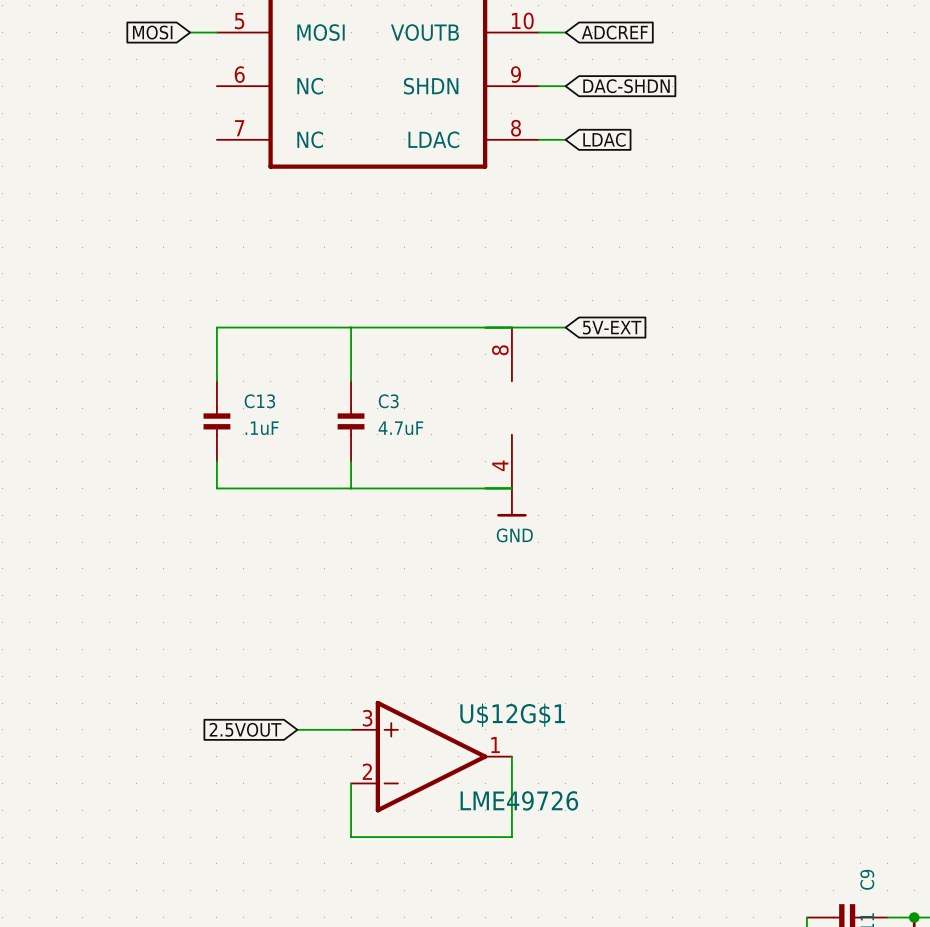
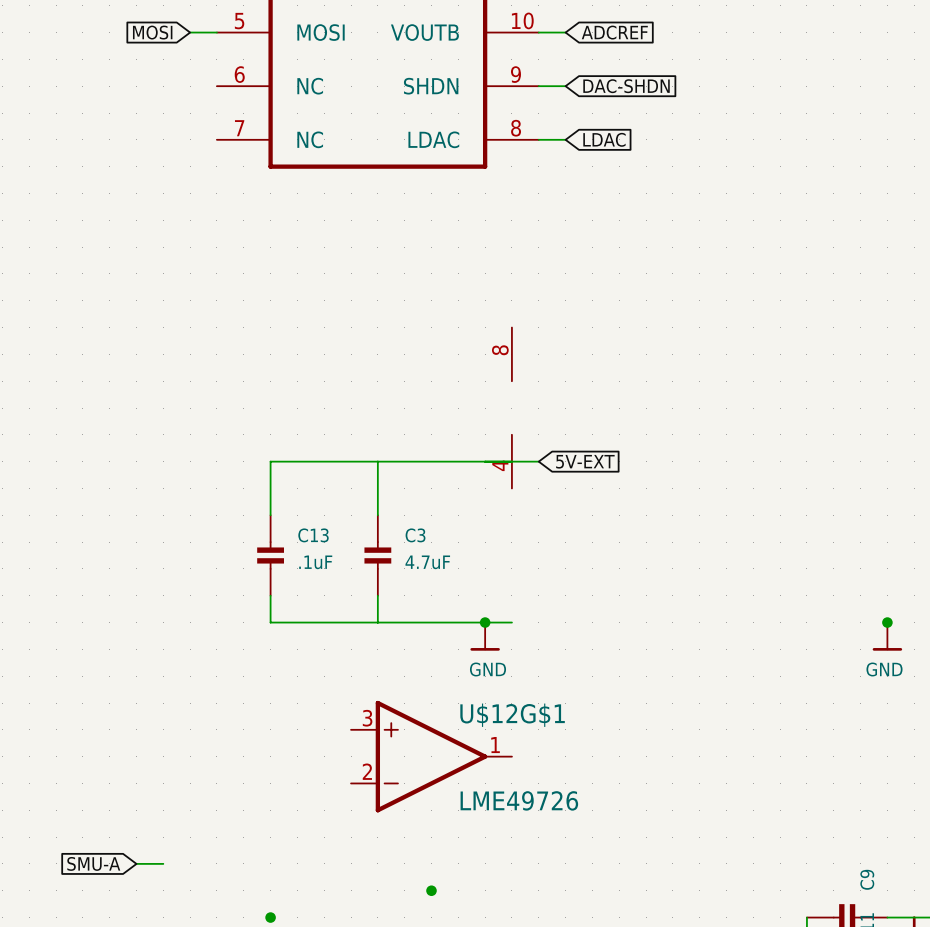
wire: (351, 327) (351, 381) -> (377, 461) (377, 515)
wire: (565, 327) (216, 327) (216, 381) -> none
global label position: 5V-EXT (612, 327) -> 5V-EXT (585, 461)
C13 position: (216, 421) -> (270, 555)
C3 position: (351, 421) -> (377, 555)
wire: (216, 461) (216, 488) (511, 488) -> none
wire: (351, 461) (351, 488) -> (377, 595) (377, 622)
wire: none -> (538, 461) (270, 461) (270, 515)
power symbol position: GND (511, 502) -> GND (485, 636)
wire: none -> (270, 595) (270, 622) (511, 622)
junction: none -> (485, 622)
junction: none -> (887, 622)
power symbol: none -> GND (887, 636)
global label: 2.5VOUT (245, 729) -> none
wire: (297, 729) (351, 729) -> none
wire: (511, 756) (511, 837) (351, 837) (351, 783) -> none
global label: none -> SMU-A (93, 863)
wire: none -> (136, 863) (163, 863)
junction: none -> (431, 890)
junction: none -> (270, 917)
junction: (914, 917) -> none

